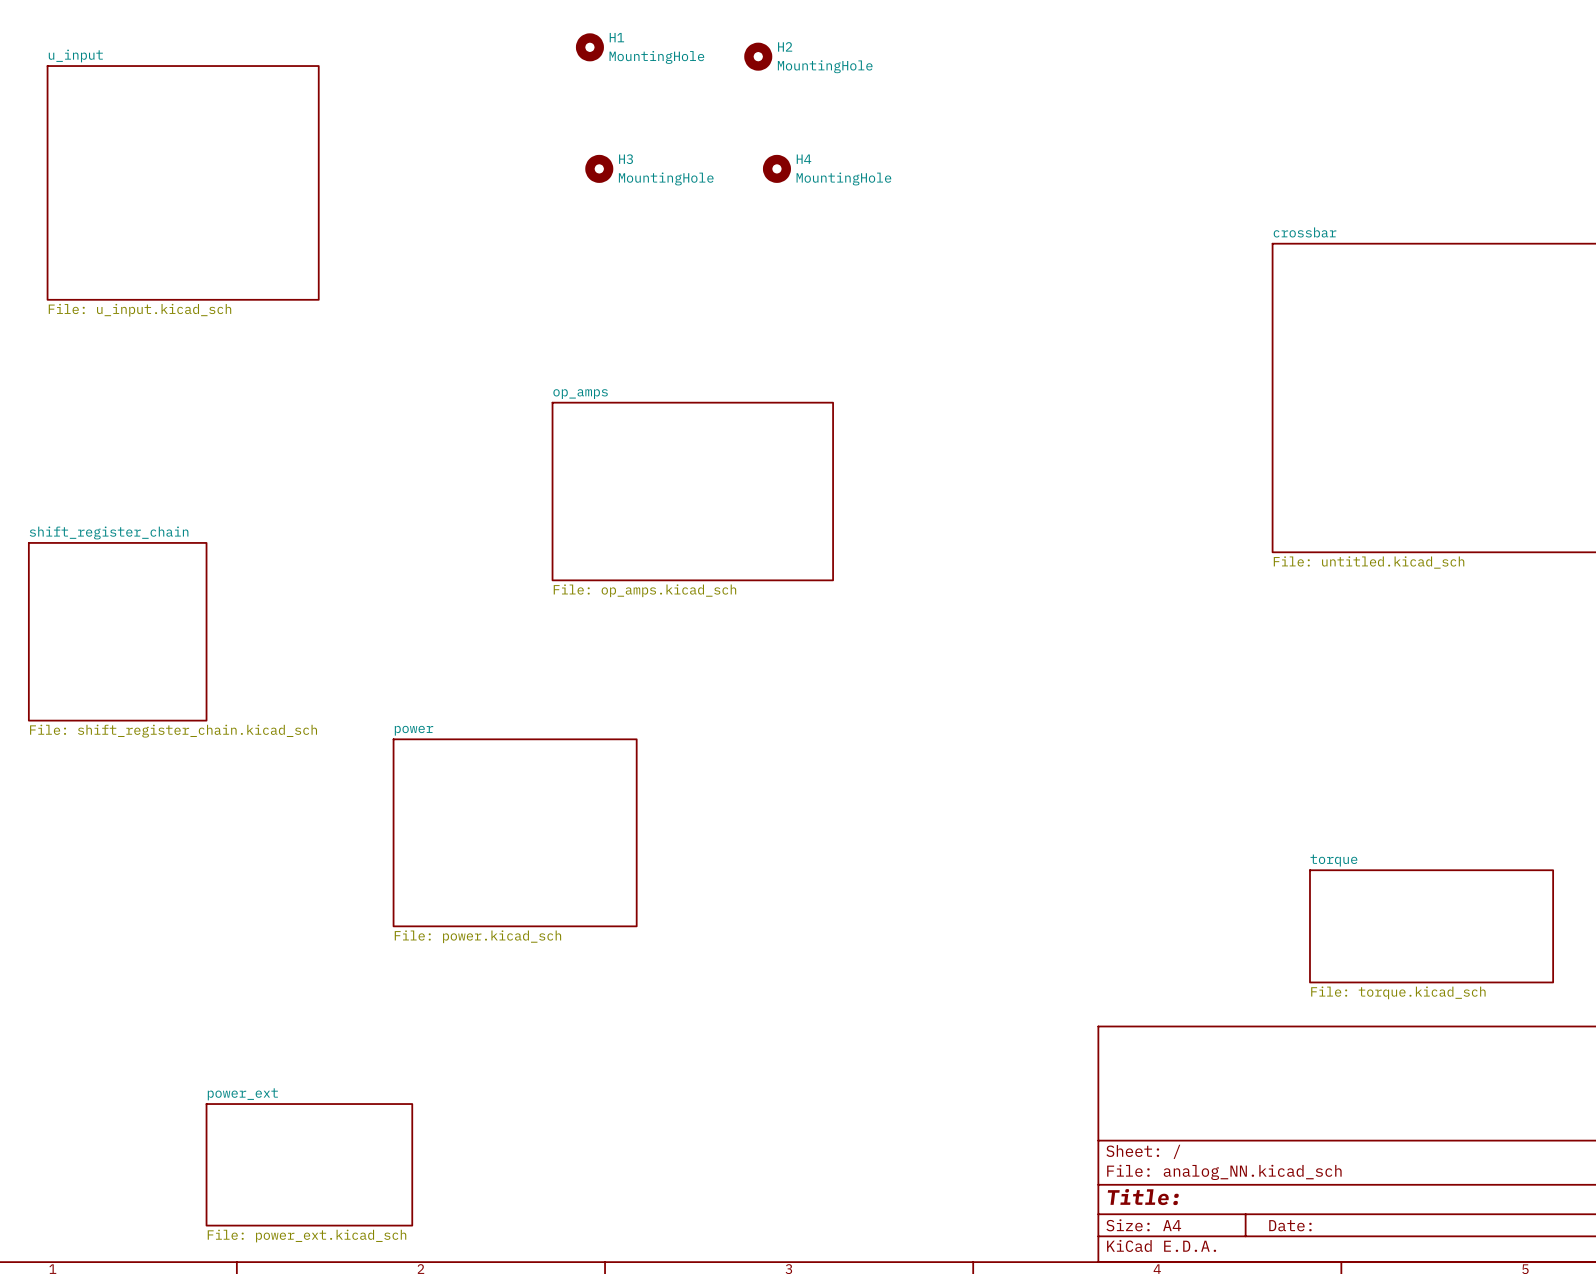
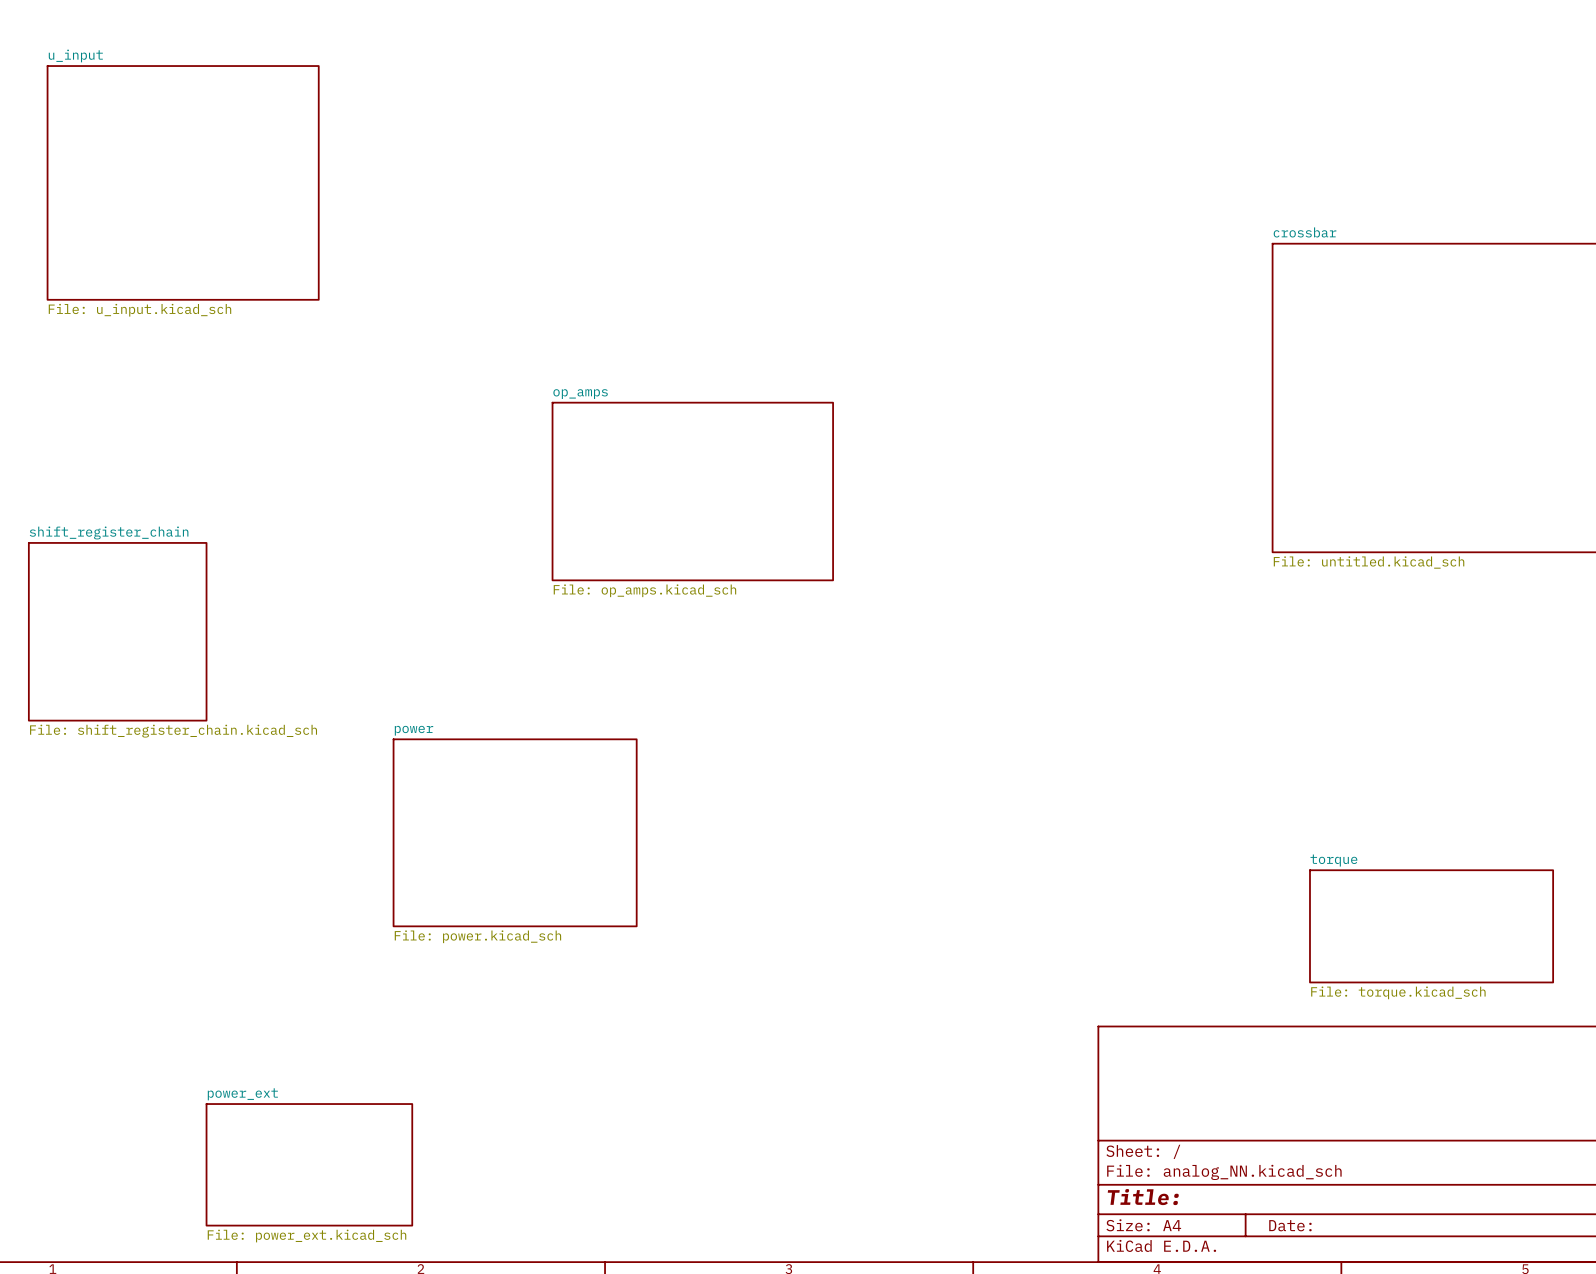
H1: MountingHole (589, 47) -> none
H2: MountingHole (758, 56) -> none
H3: MountingHole (599, 168) -> none
H4: MountingHole (776, 168) -> none

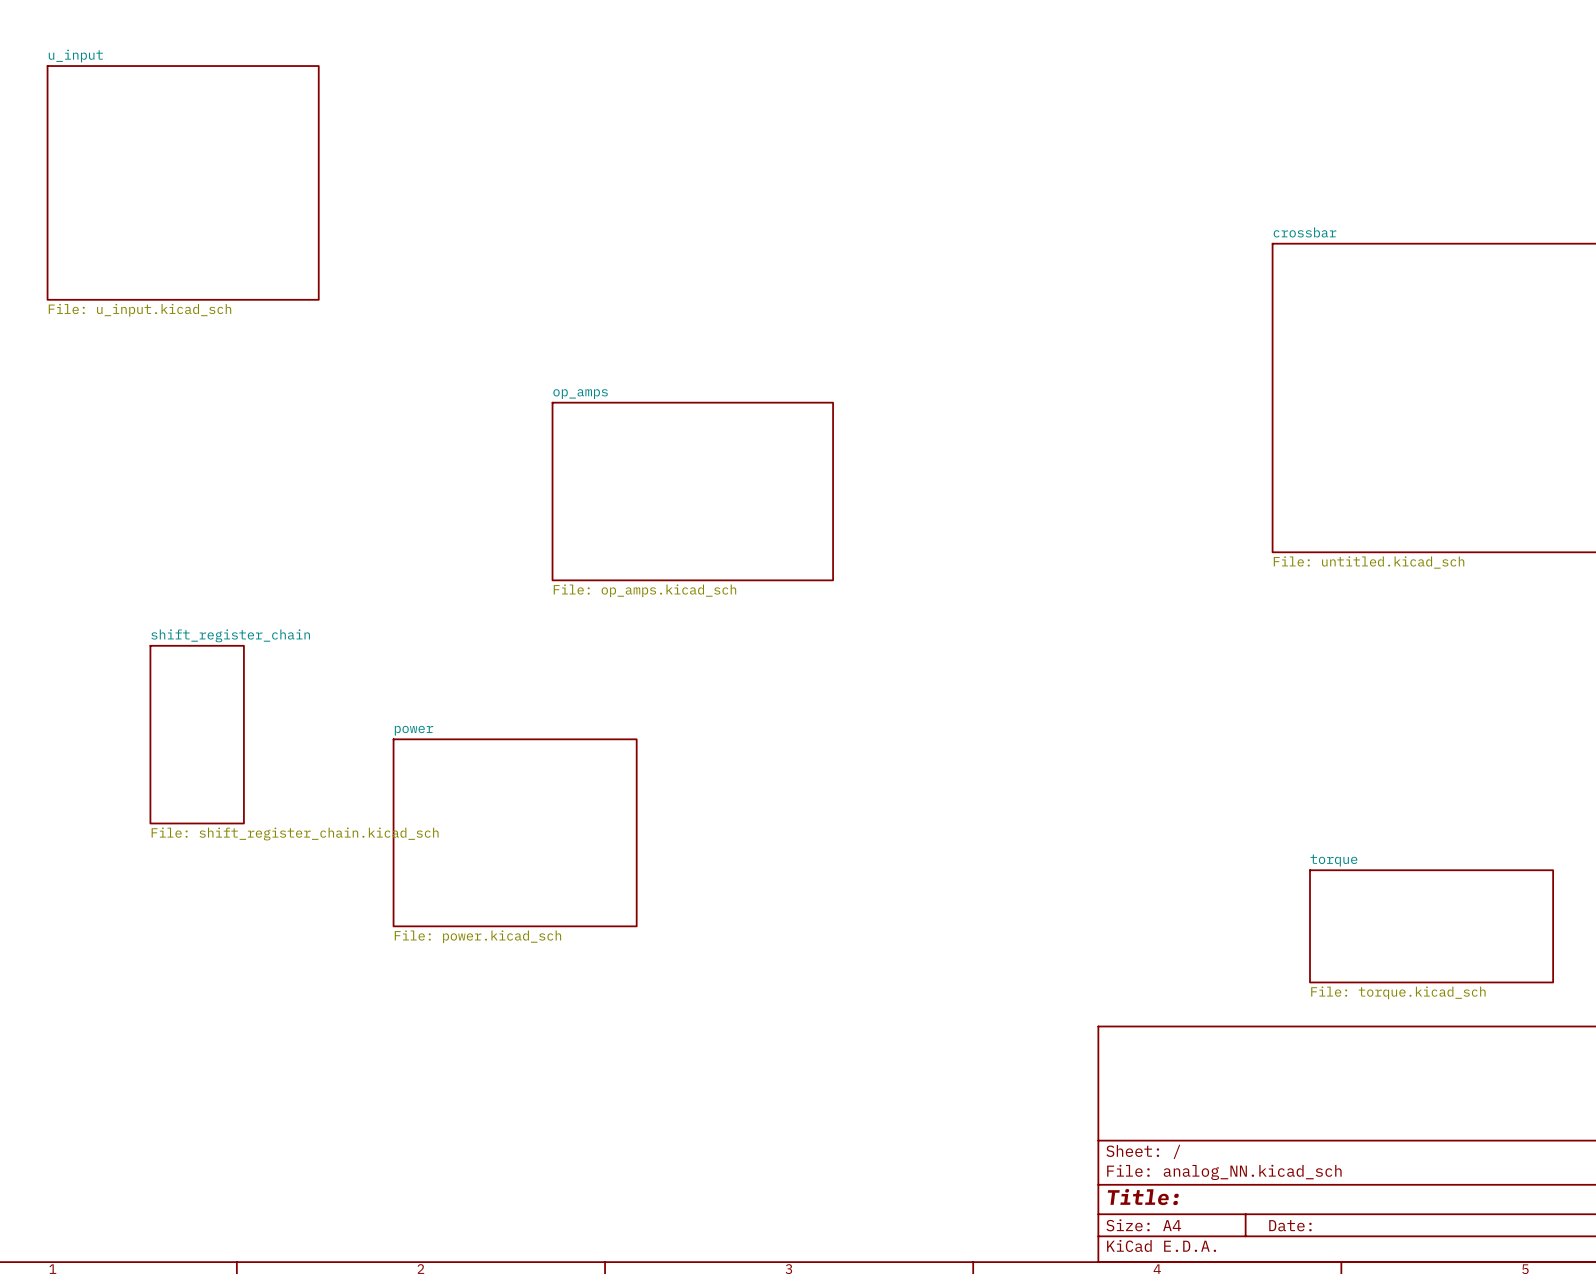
sheet shift_register_chain: File: shift_register_chain.kicad_sch (117, 631) -> none
sheet shift_register_chain: none -> File: shift_register_chain.kicad_sch (197, 734)
sheet power_ext: File: power_ext.kicad_sch (309, 1164) -> none

